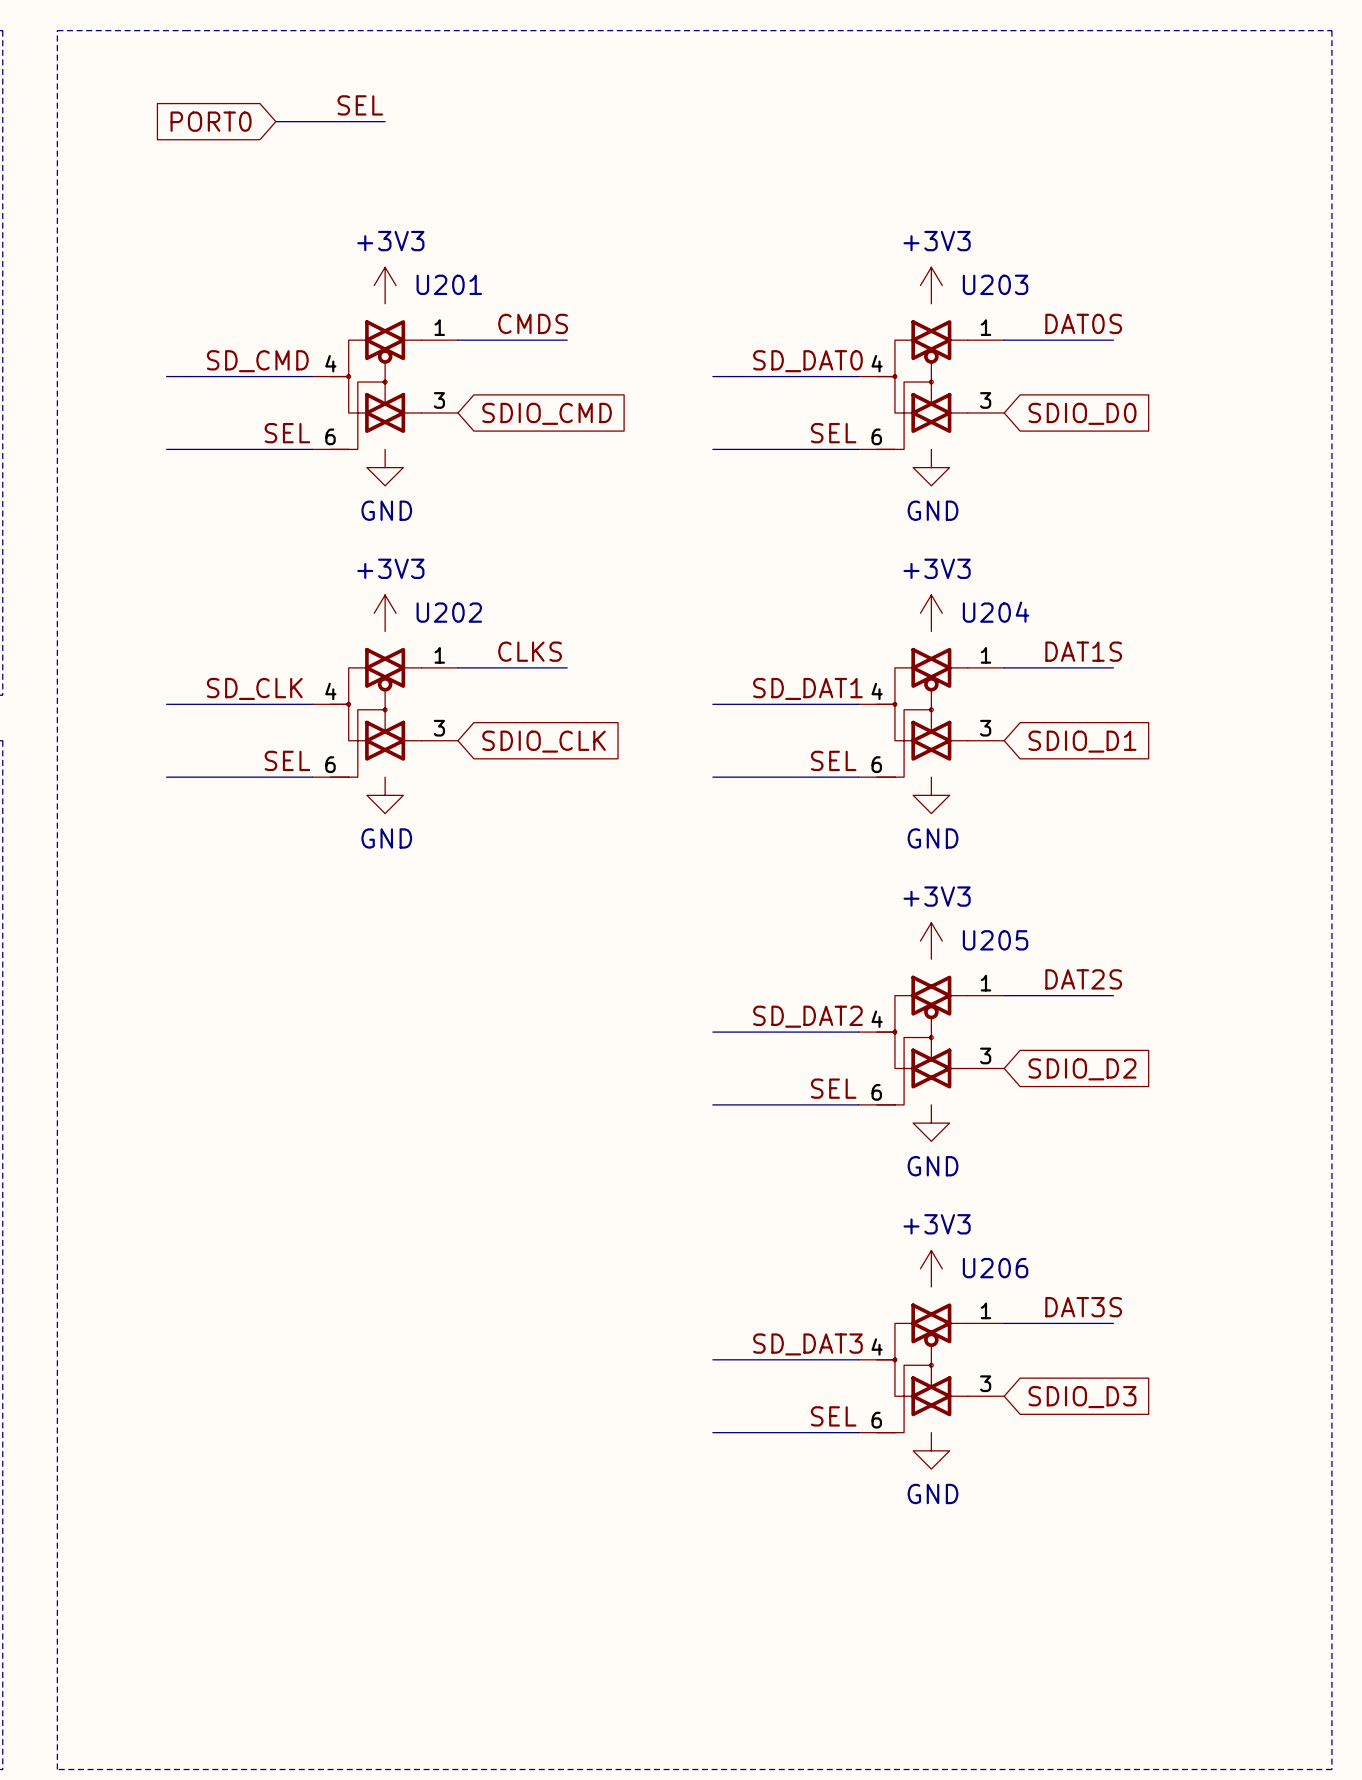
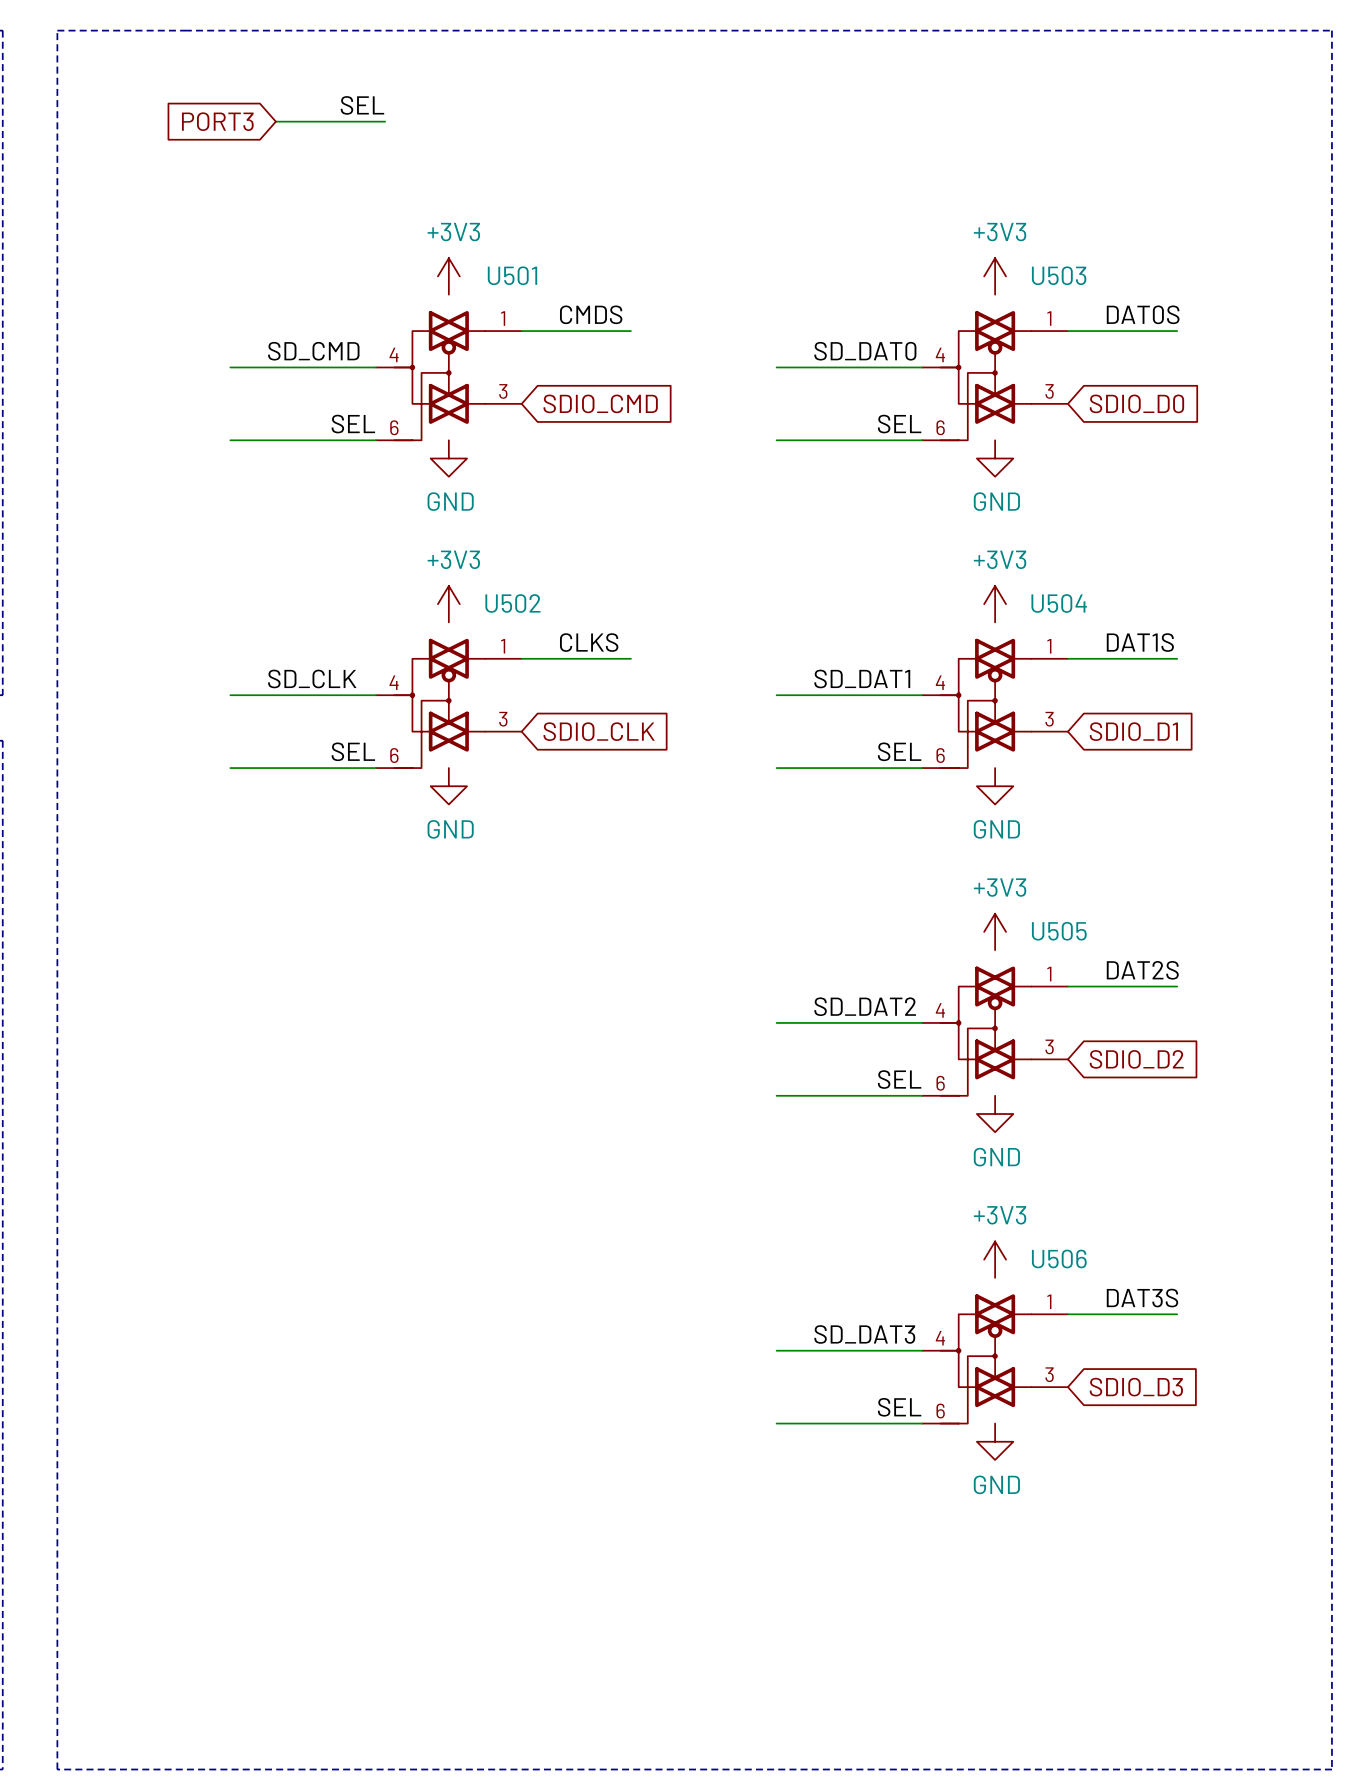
global label: PORT0 (211, 121) -> PORT3 (217, 121)
power symbol position: +3V3 (385, 285) -> +3V3 (448, 276)
power symbol position: +3V3 (931, 285) -> +3V3 (995, 276)
label position: CMDS (533, 323) -> CMDS (591, 314)
label position: DAT0S (1083, 323) -> DAT0S (1143, 314)
wire: (457, 340) (567, 340) -> (521, 331) (630, 331)
wire: (1004, 340) (1113, 340) -> (1067, 331) (1177, 331)
label position: SD_CMD (257, 361) -> SD_CMD (313, 351)
label position: SD_DAT0 (807, 361) -> SD_DAT0 (865, 351)
U501: none -> (448, 375)
U503: none -> (995, 375)
wire: (166, 376) (312, 376) -> (230, 367) (376, 367)
wire: (712, 376) (858, 376) -> (776, 367) (922, 367)
U201: (385, 384) -> none
U203: (931, 384) -> none
global label position: SDIO_CMD (547, 413) -> SDIO_CMD (600, 403)
global label position: SDIO_D0 (1082, 413) -> SDIO_D0 (1136, 403)
label position: SEL (287, 433) -> SEL (353, 424)
label position: SEL (833, 433) -> SEL (899, 424)
wire: (166, 449) (312, 449) -> (230, 440) (376, 440)
wire: (712, 449) (858, 449) -> (776, 440) (922, 440)
power symbol position: GND (385, 467) -> GND (448, 458)
power symbol position: GND (931, 467) -> GND (995, 458)
power symbol position: +3V3 (385, 613) -> +3V3 (448, 604)
power symbol position: +3V3 (931, 613) -> +3V3 (995, 604)
label position: CLKS (530, 651) -> CLKS (589, 642)
label position: DAT1S (1083, 651) -> DAT1S (1140, 642)
wire: (457, 667) (567, 667) -> (521, 658) (630, 658)
wire: (1004, 667) (1113, 667) -> (1067, 658) (1177, 658)
label position: SD_CLK (254, 688) -> SD_CLK (312, 678)
label position: SD_DAT1 (807, 688) -> SD_DAT1 (862, 678)
U502: none -> (448, 703)
U504: none -> (995, 703)
wire: (166, 704) (312, 704) -> (230, 695) (376, 695)
wire: (712, 704) (858, 704) -> (776, 695) (922, 695)
U202: (385, 712) -> none
U204: (931, 712) -> none
global label position: SDIO_CLK (544, 741) -> SDIO_CLK (599, 731)
global label position: SDIO_D1 (1082, 741) -> SDIO_D1 (1133, 731)
label position: SEL (287, 760) -> SEL (353, 751)
label position: SEL (833, 760) -> SEL (899, 751)
wire: (166, 777) (312, 777) -> (230, 768) (376, 768)
wire: (712, 777) (858, 777) -> (776, 768) (922, 768)
power symbol position: GND (385, 795) -> GND (448, 786)
power symbol position: GND (931, 795) -> GND (995, 786)
power symbol position: +3V3 (931, 941) -> +3V3 (995, 931)
label position: DAT2S (1083, 979) -> DAT2S (1142, 970)
wire: (1004, 995) (1113, 995) -> (1067, 986) (1177, 986)
label position: SD_DAT2 (807, 1016) -> SD_DAT2 (865, 1006)
U505: none -> (995, 1031)
wire: (712, 1032) (858, 1032) -> (776, 1022) (922, 1022)
U205: (931, 1040) -> none
global label position: SDIO_D2 (1082, 1069) -> SDIO_D2 (1136, 1059)
label position: SEL (833, 1088) -> SEL (899, 1079)
wire: (712, 1104) (858, 1104) -> (776, 1095) (922, 1095)
power symbol position: GND (931, 1123) -> GND (995, 1114)
power symbol position: +3V3 (931, 1268) -> +3V3 (995, 1259)
label position: DAT3S (1083, 1307) -> DAT3S (1142, 1298)
wire: (1004, 1323) (1113, 1323) -> (1067, 1314) (1177, 1314)
label position: SD_DAT3 (807, 1344) -> SD_DAT3 (864, 1334)
U506: none -> (995, 1358)
wire: (712, 1359) (858, 1359) -> (776, 1350) (922, 1350)
U206: (931, 1368) -> none
global label position: SDIO_D3 (1082, 1397) -> SDIO_D3 (1136, 1387)
label position: SEL (833, 1416) -> SEL (899, 1407)
wire: (712, 1432) (858, 1432) -> (776, 1423) (922, 1423)
power symbol position: GND (931, 1450) -> GND (995, 1441)

